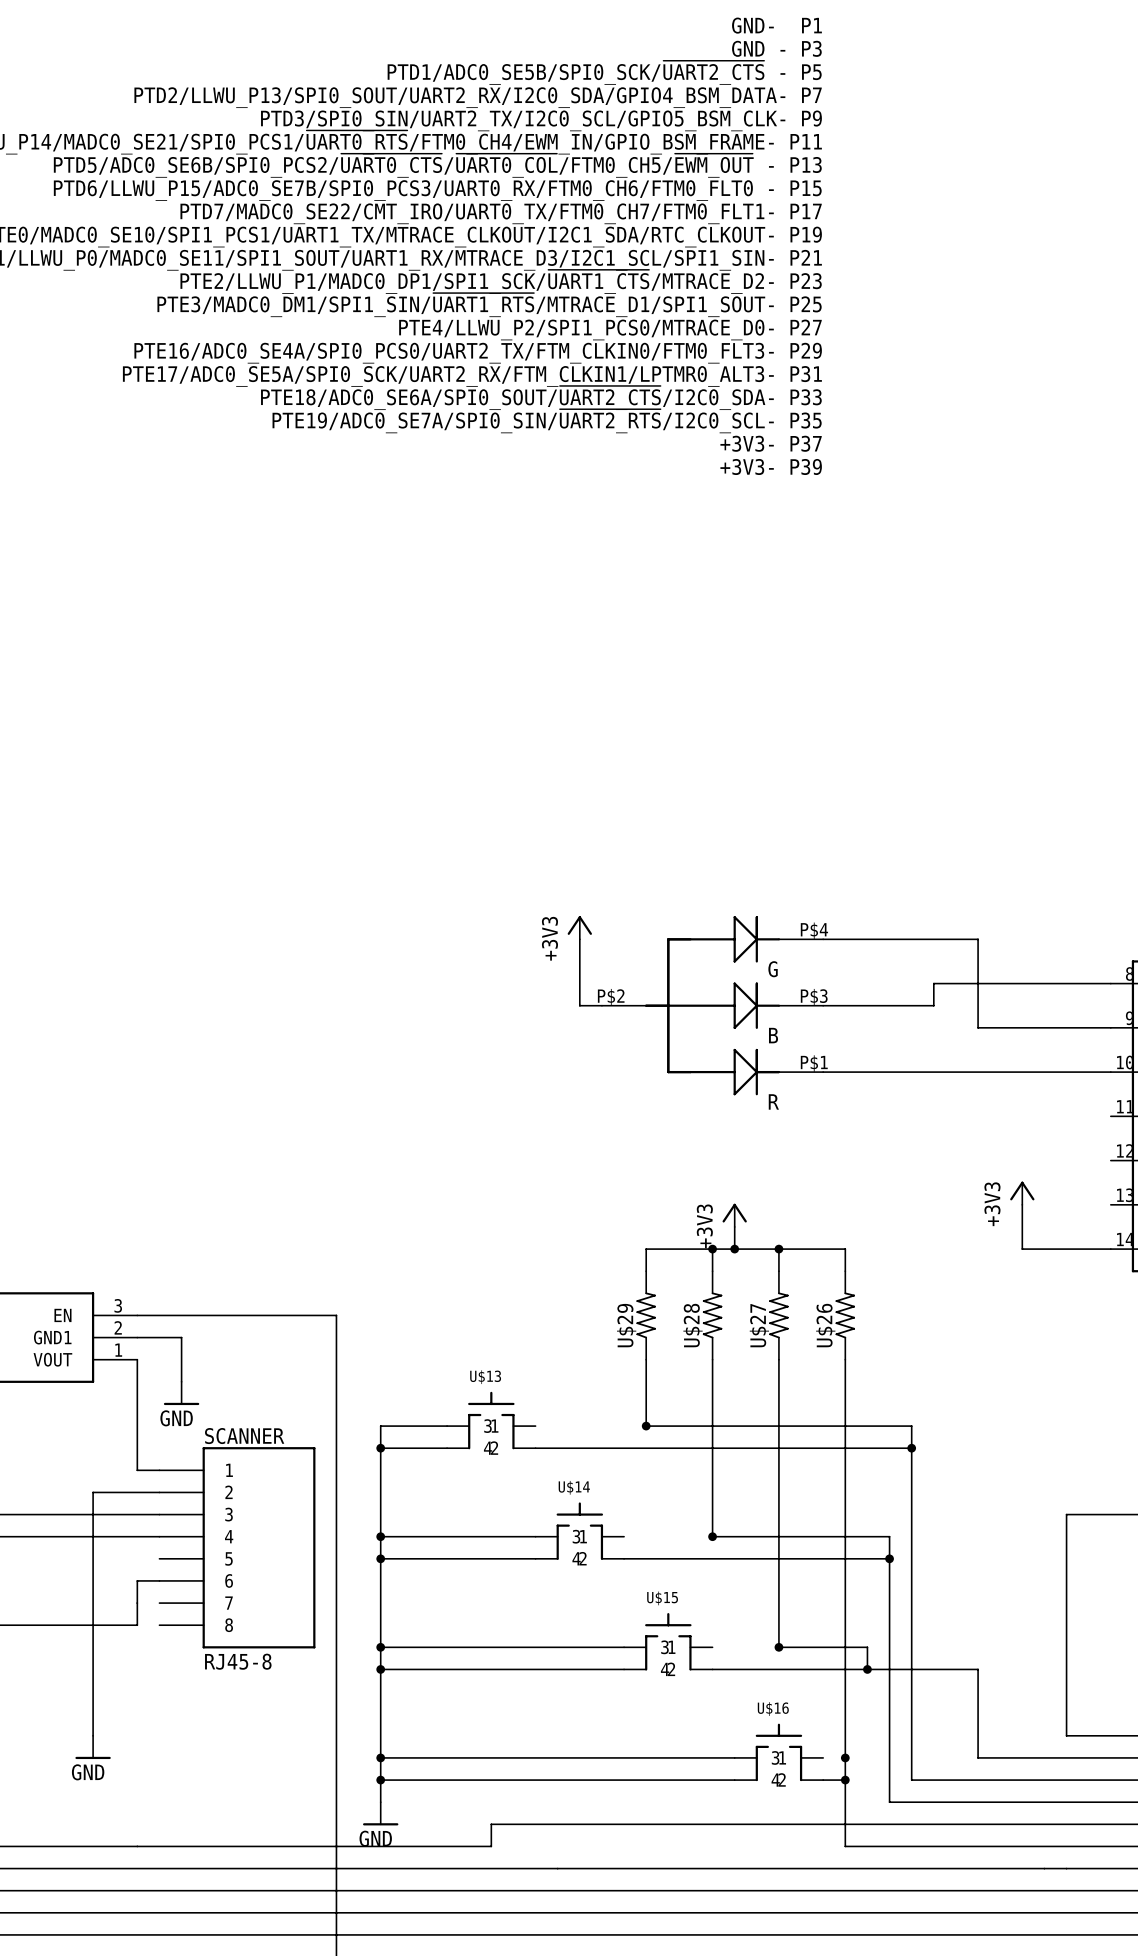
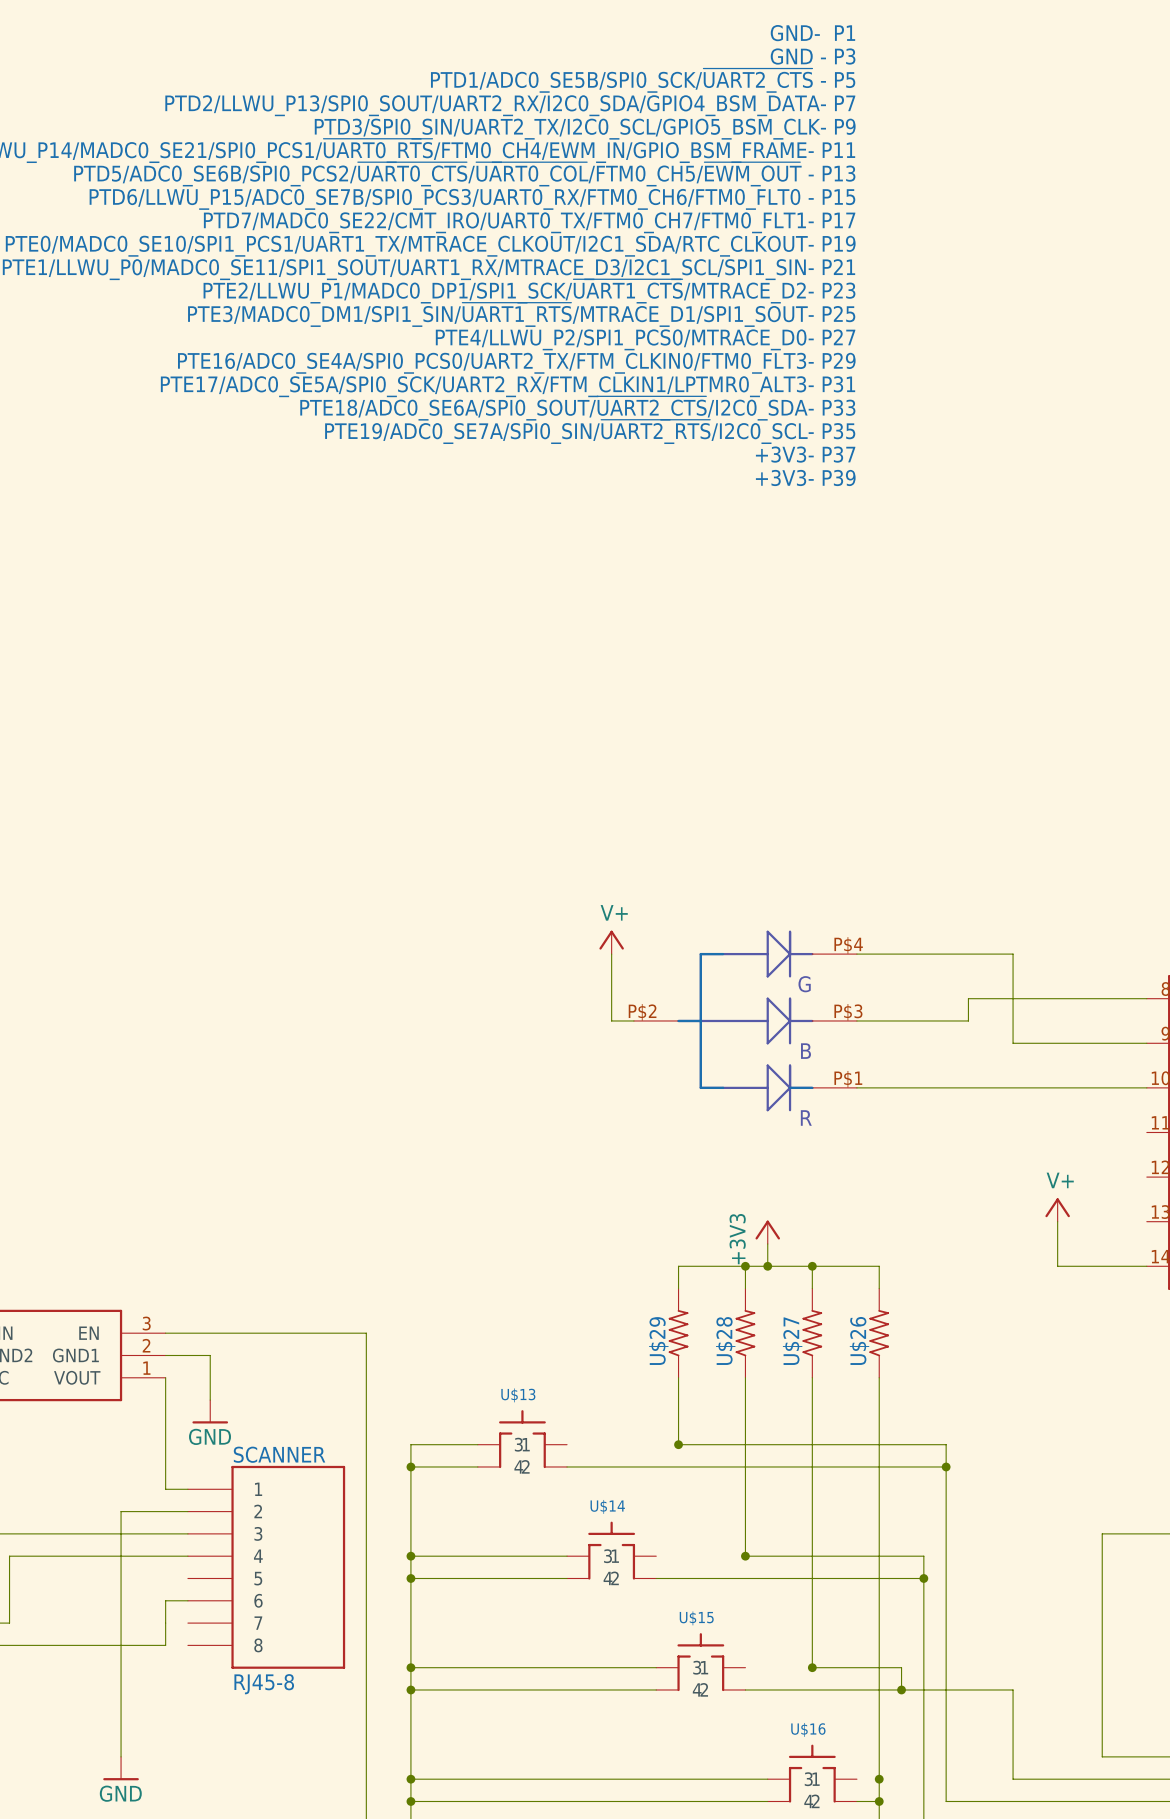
power symbol: +3V3 (579, 927) -> V+ (611, 942)
power symbol: +3V3 (1022, 1193) -> V+ (1057, 1209)

